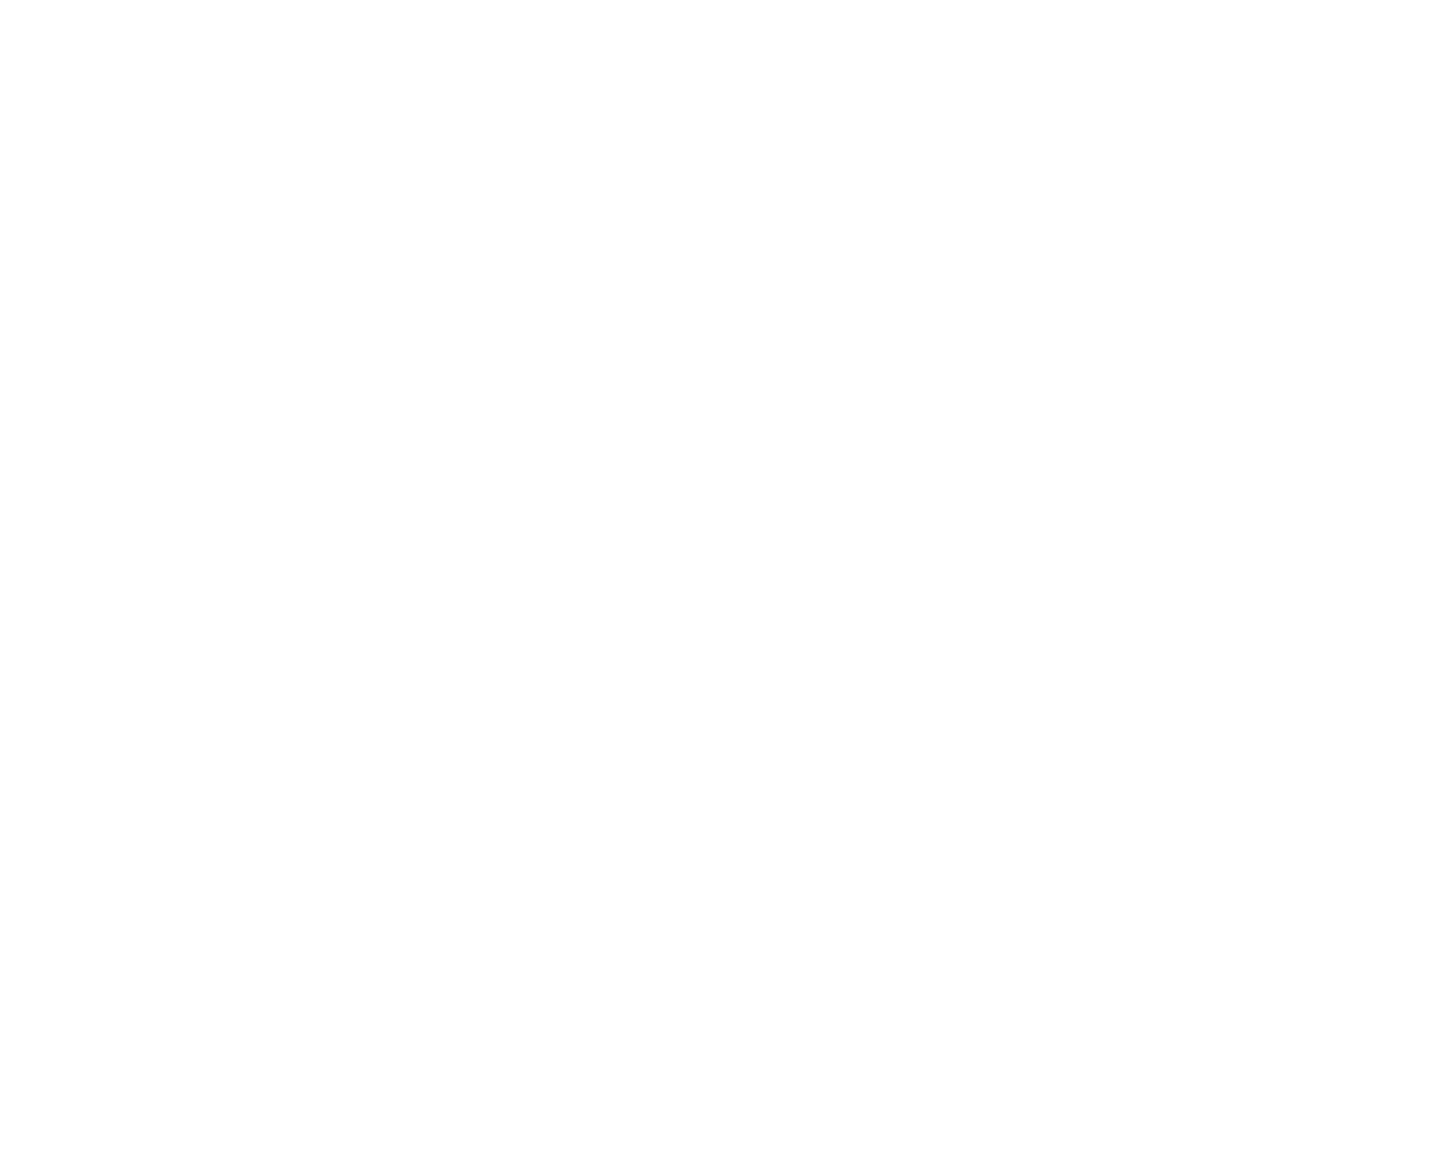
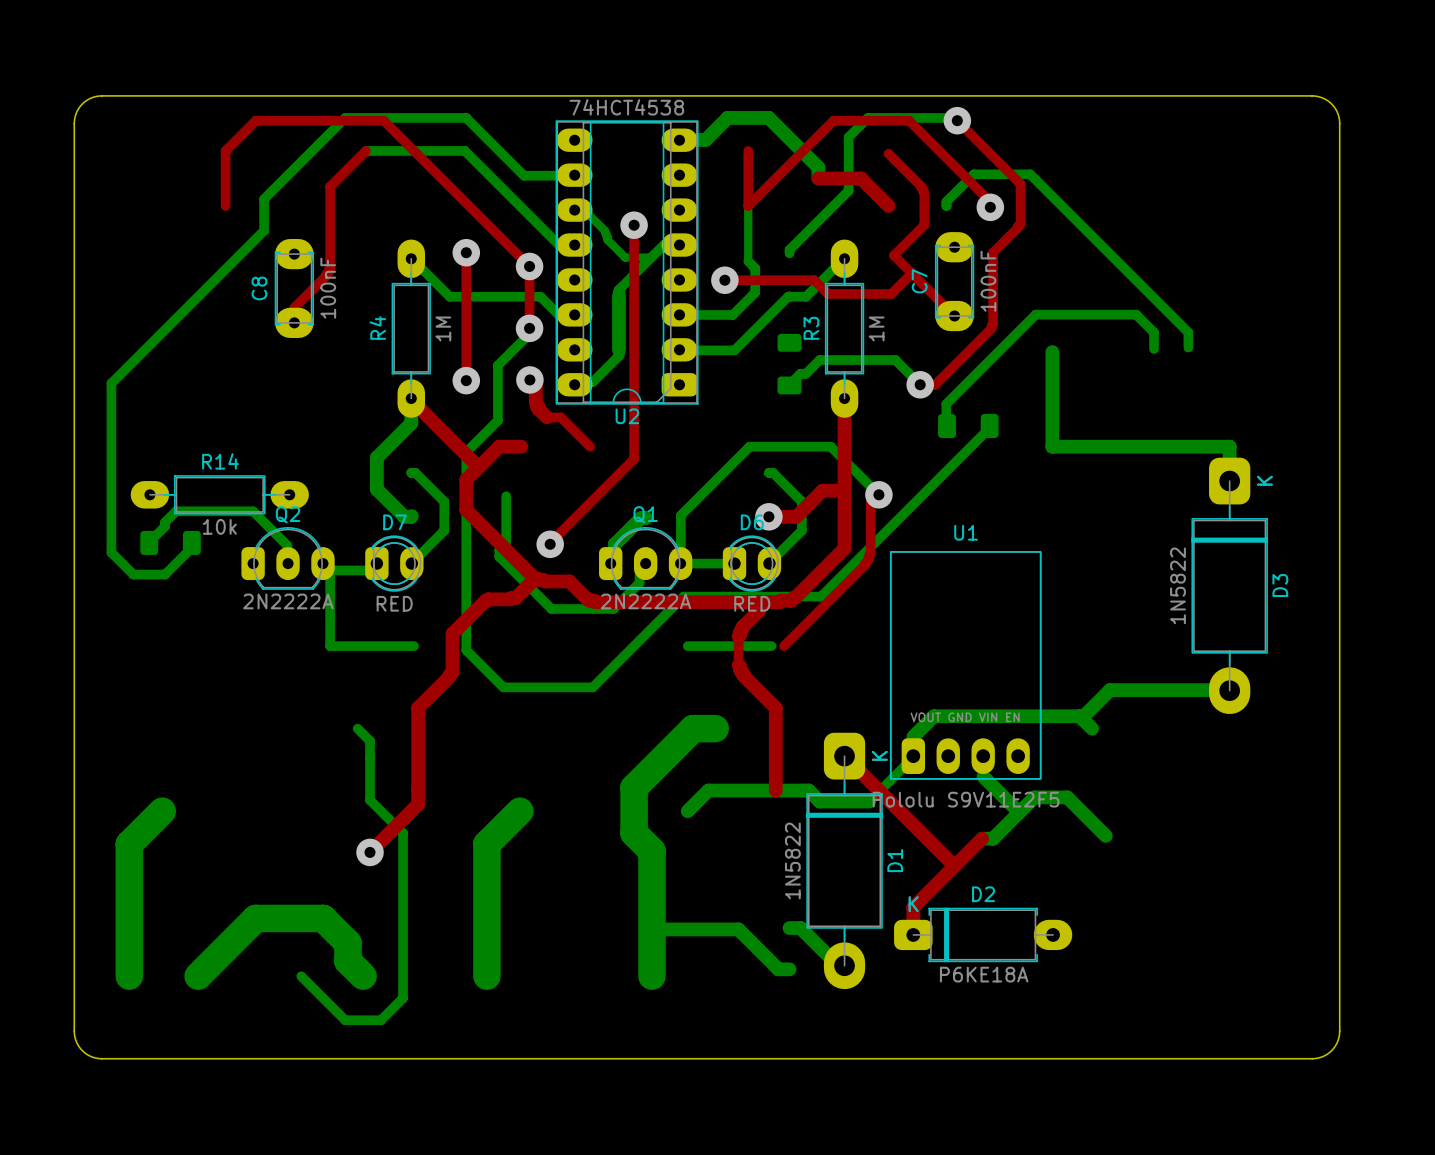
board edge: none -> (101, 95) (1312, 95) (1321, 97) (1329, 101) (1336, 111) (1339, 123) (1339, 1031) (1338, 1040) (1333, 1048) (1324, 1056) (1312, 1058) (101, 1058) (92, 1057) (84, 1052) (77, 1043) (74, 1031) (74, 123) (77, 111) (82, 103) (89, 98) (101, 95)
bottom track: none -> (954, 117) (867, 117) (848, 137) (848, 190) (789, 249) (789, 253)
top track: none -> (957, 120) (1020, 183) (1020, 223) (993, 252) (991, 328) (935, 384) (920, 384)
via: none -> (957, 120)
bottom track: none -> (679, 139) (705, 139) (727, 117) (768, 117) (818, 167) (818, 178)
bottom track: none -> (365, 150) (464, 150) (558, 244) (574, 244)
top track: none -> (365, 150) (330, 186) (330, 269) (326, 276) (294, 307) (294, 322)
top track: none -> (748, 150) (748, 205) (833, 120) (909, 120) (990, 201) (990, 207)
top track: none -> (888, 153) (921, 186) (924, 192) (924, 225) (894, 255) (954, 315)
bottom track: none -> (574, 175) (524, 175) (466, 117) (345, 117) (264, 199) (264, 230) (111, 383) (111, 552) (133, 574) (165, 574) (192, 547) (191, 542)
top track: none -> (818, 178) (861, 178) (888, 205)
top track: none -> (225, 205) (225, 150) (255, 120) (383, 120) (529, 266) (529, 328)
bottom track: none -> (748, 205) (748, 261) (755, 268) (755, 292) (732, 314) (679, 314)
bottom track: none -> (947, 205) (946, 201) (973, 174) (1030, 174) (1188, 332) (1188, 347)
via: none -> (990, 207)
bottom track: none -> (574, 210) (584, 210) (605, 231) (607, 240) (625, 257) (651, 257)
top track: none -> (634, 225) (634, 459) (550, 542)
via: none -> (634, 225)
bottom track: none -> (679, 244) (664, 244) (618, 289) (618, 355) (592, 382) (577, 382)
top track: none -> (466, 252) (466, 380)
via: none -> (466, 252)
bottom track: none -> (411, 258) (449, 296) (540, 296) (558, 314) (574, 314)
bottom track: none -> (844, 258) (806, 296) (788, 296) (734, 350) (679, 350)
U2: none -> 74HCT4538 (627, 262)
via: none -> (529, 266)
top track: none -> (911, 273) (891, 293) (828, 293) (814, 280) (724, 280)
via: none -> (724, 280)
C7: none -> 100nF (954, 281)
C8: none -> 100nF (294, 288)
R4: none -> 1M (411, 328)
via: none -> (529, 328)
R3: none -> 1M (844, 328)
bottom track: none -> (529, 333) (497, 365) (497, 420) (466, 452) (466, 650) (503, 687) (592, 687) (683, 596) (821, 596) (989, 426)
bottom track: none -> (1154, 349) (1154, 332) (1136, 314) (1035, 314) (946, 404) (947, 426)
bottom track: none -> (1052, 352) (1052, 446) (1229, 446) (1229, 481)
part: none -> (789, 364)
top track: none -> (529, 379) (535, 385) (535, 401) (538, 409) (547, 417) (560, 417) (590, 446)
via: none -> (529, 379)
via: none -> (466, 380)
bottom track: none -> (920, 384) (895, 360) (819, 360) (806, 373) (800, 373) (789, 385)
via: none -> (920, 384)
bottom track: none -> (411, 398) (411, 423) (376, 457) (376, 489) (404, 516) (411, 516)
top track: none -> (844, 398) (844, 548) (790, 600) (595, 602) (587, 599) (569, 581) (544, 581) (535, 578)
top track: none -> (411, 399) (478, 467)
part: none -> (968, 426)
top track: none -> (521, 446) (499, 446) (466, 479) (466, 509) (535, 578)
bottom track: none -> (411, 473) (415, 472) (444, 501) (444, 530) (411, 563)
bottom track: none -> (769, 473) (773, 472) (801, 501) (801, 530) (768, 563)
top track: none -> (836, 490) (822, 490) (796, 516) (768, 516)
R14: none -> 10k (219, 494)
bottom track: none -> (878, 494) (830, 446) (749, 446) (680, 515) (680, 563) (734, 563)
top track: none -> (878, 494) (870, 503) (870, 553) (867, 560) (784, 646)
via: none -> (878, 494)
bottom track: none -> (506, 496) (506, 542) (499, 549) (499, 556) (551, 608) (613, 608) (639, 582) (639, 569)
via: none -> (768, 516)
bottom track: none -> (645, 517) (640, 518) (614, 544)
bottom track: none -> (149, 542) (176, 511) (253, 511) (287, 545) (287, 563)
part: none -> (170, 542)
via: none -> (550, 544)
Q2: none -> 2N2222A (288, 558)
Q1: none -> 2N2222A (645, 558)
bottom track: none -> (376, 563) (370, 570) (330, 570)
D7: none -> RED (394, 563)
D6: none -> RED (751, 563)
bottom track: none -> (330, 570) (330, 646) (414, 646)
top track: none -> (535, 578) (515, 597) (485, 600) (452, 633) (452, 672) (418, 708) (418, 804) (370, 852)
D3: none -> 1N5822 (1229, 585)
top track: none -> (759, 602) (759, 610) (742, 626) (738, 636) (738, 665) (744, 676) (775, 708) (775, 790)
bottom track: none -> (687, 646) (771, 646)
U1: none -> Pololu S9V11E2F5 (965, 665)
bottom track: none -> (1229, 690) (1110, 690) (1081, 718)
bottom track: none -> (357, 728) (370, 741) (370, 800) (403, 833) (403, 998) (381, 1020) (345, 1020) (301, 976)
bottom track: none -> (715, 728) (693, 728) (634, 787) (634, 833) (651, 851) (651, 976)
bottom track: none -> (1092, 728) (1079, 716) (933, 716) (913, 736) (913, 756)
top track: none -> (844, 756) (954, 866)
bottom track: none -> (983, 756) (983, 776) (1019, 812)
bottom track: none -> (913, 757) (869, 801) (819, 801) (808, 790) (708, 790) (687, 811)
bottom track: none -> (162, 811) (129, 844) (129, 976)
bottom track: none -> (519, 811) (486, 844) (486, 976)
bottom track: none -> (1105, 835) (1067, 797) (1034, 797) (993, 838) (982, 838)
top track: none -> (982, 838) (913, 907) (913, 934)
via: none -> (370, 852)
D1: none -> 1N5822 (844, 860)
bottom track: none -> (789, 928) (800, 928) (837, 965)
bottom track: none -> (651, 929) (738, 929) (778, 969) (789, 969)
D2: none -> P6KE18A (983, 934)
bottom track: none -> (198, 976) (255, 918) (323, 918) (348, 943) (348, 961) (363, 976)

